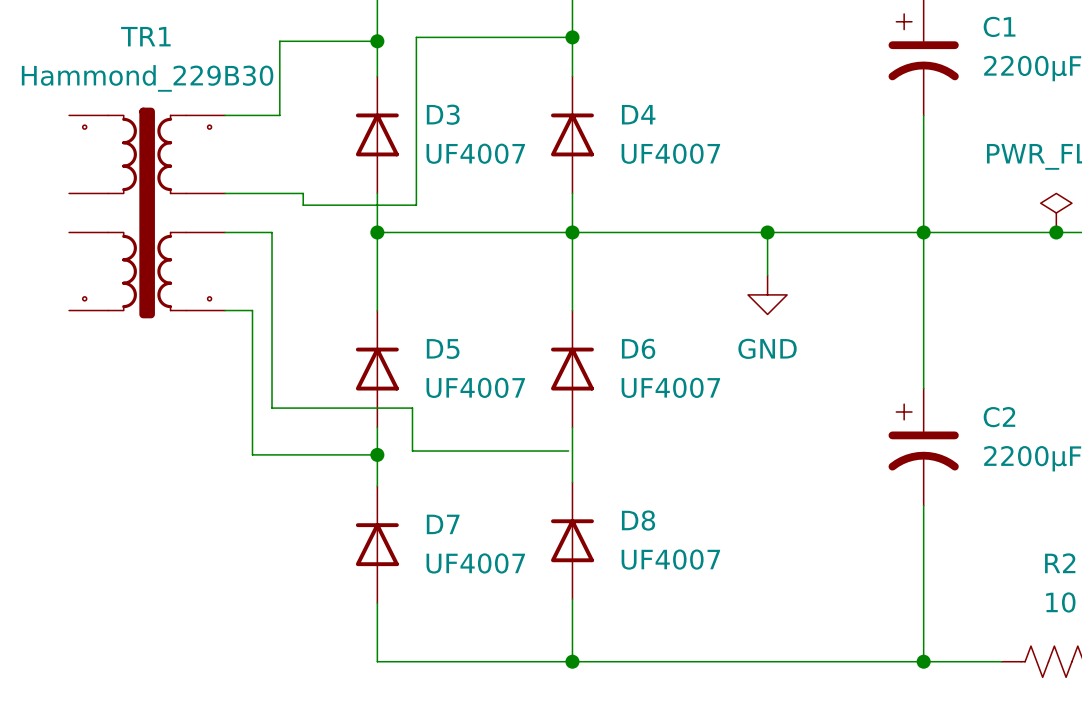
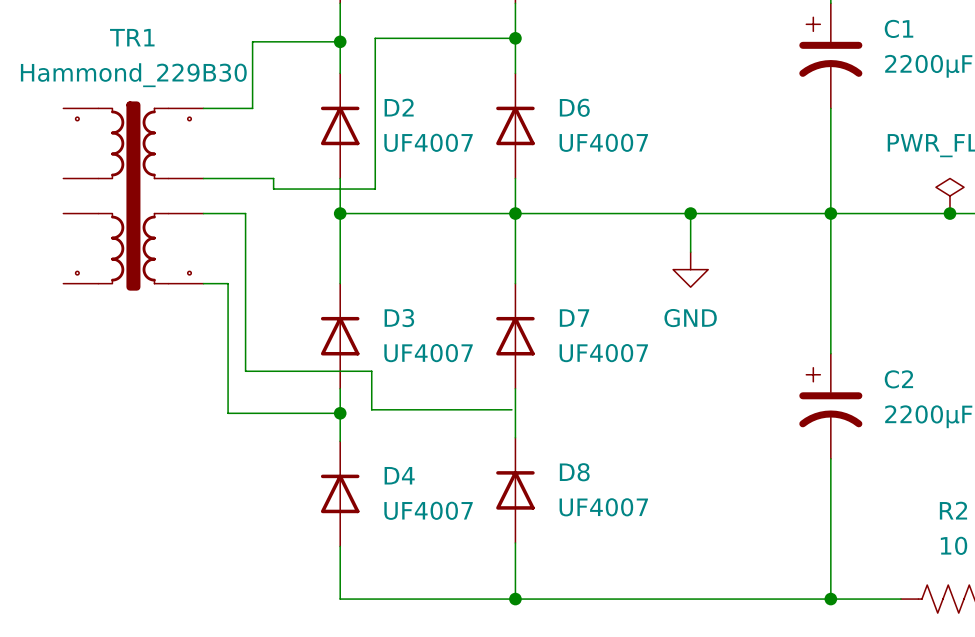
D3 name: D3 (443, 114) -> D2 (399, 107)
D4 name: D4 (638, 114) -> D6 (574, 107)
D6 name: D6 (638, 348) -> D7 (574, 318)
D5 name: D5 (443, 349) -> D3 (399, 318)
D7 name: D7 (443, 524) -> D4 (399, 475)

